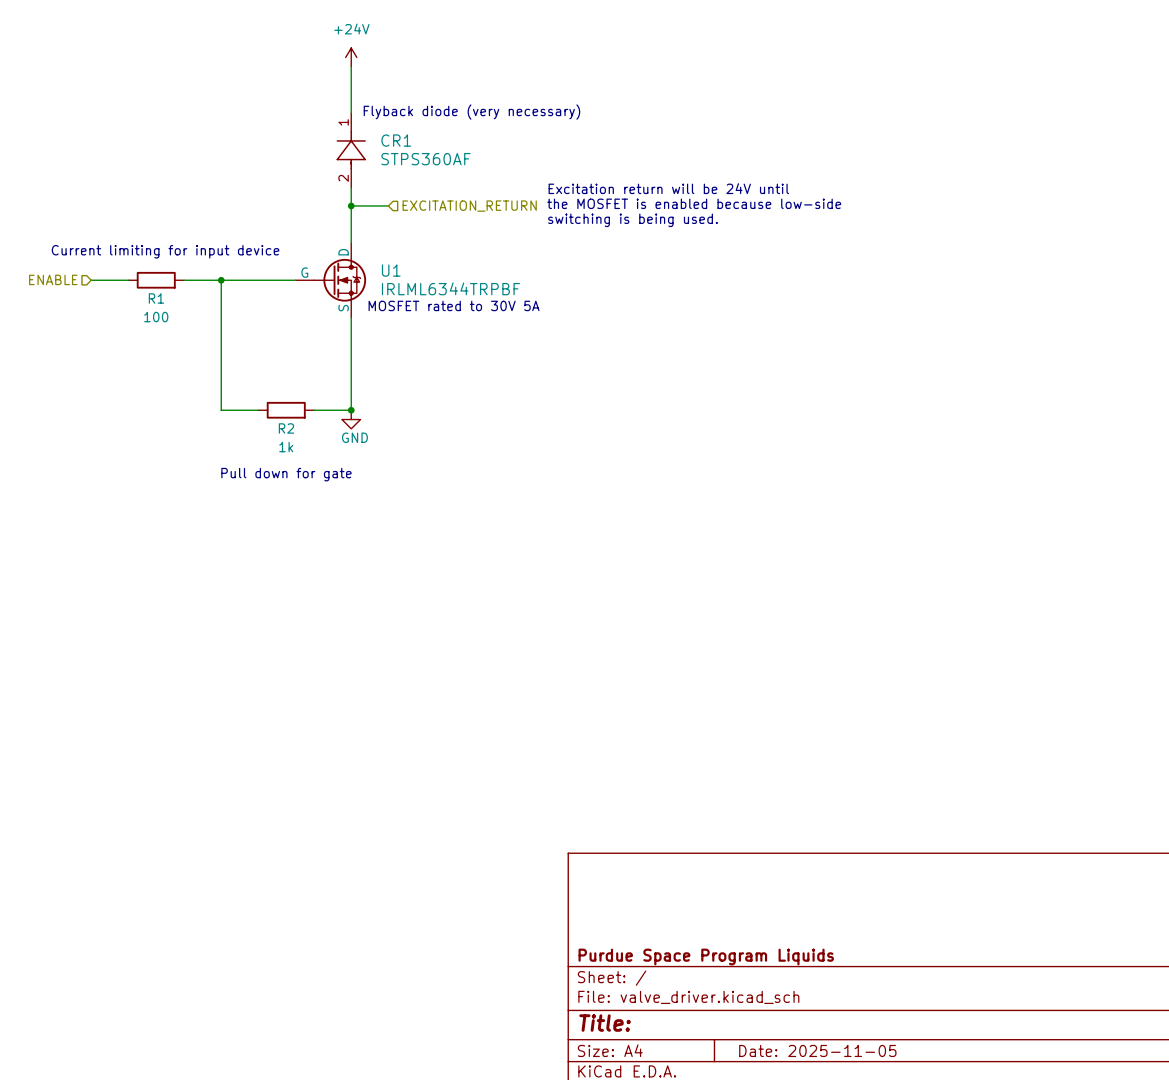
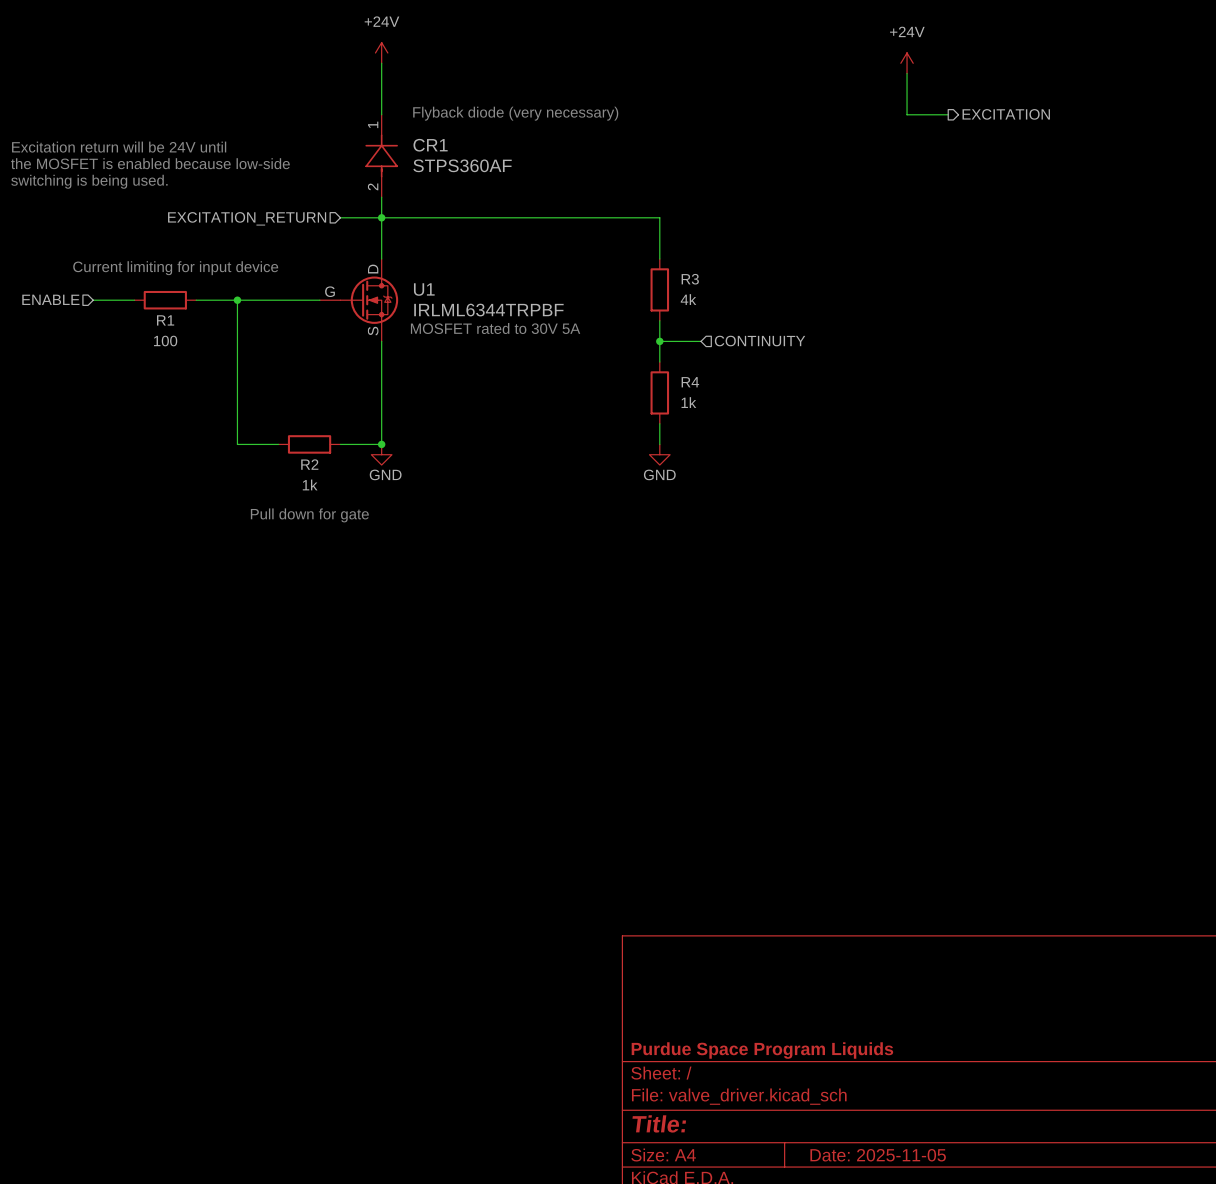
power symbol: none -> +24V (907, 63)
wire: none -> (907, 73) (907, 114) (948, 114)
hierarchical label: none -> EXCITATION (1006, 114)
text: none -> Excitation return will be 24V until (119, 147)
text: none -> the MOSFET is enabled because low-side (150, 163)
text: none -> switching is being used. (89, 181)
text: Excitation return will be 24V until (668, 188) -> none
text: the MOSFET is enabled because low-side (694, 203) -> none
wire: none -> (340, 217) (381, 217)
wire: none -> (422, 217) (659, 217) (659, 259)
hierarchical label rotation: 0° (469, 206) -> 180° (247, 218)
hierarchical label position: EXCITATION_RETURN (469, 206) -> EXCITATION_RETURN (247, 218)
text: switching is being used. (632, 220) -> none
R3: none -> 4k (659, 289)
wire: none -> (659, 320) (659, 362)
wire: none -> (659, 341) (701, 341)
junction: none -> (659, 341)
hierarchical label: none -> CONTINUITY (760, 341)
R4: none -> 1k (659, 392)
wire: none -> (659, 423) (659, 444)
power symbol: none -> GND (659, 454)

